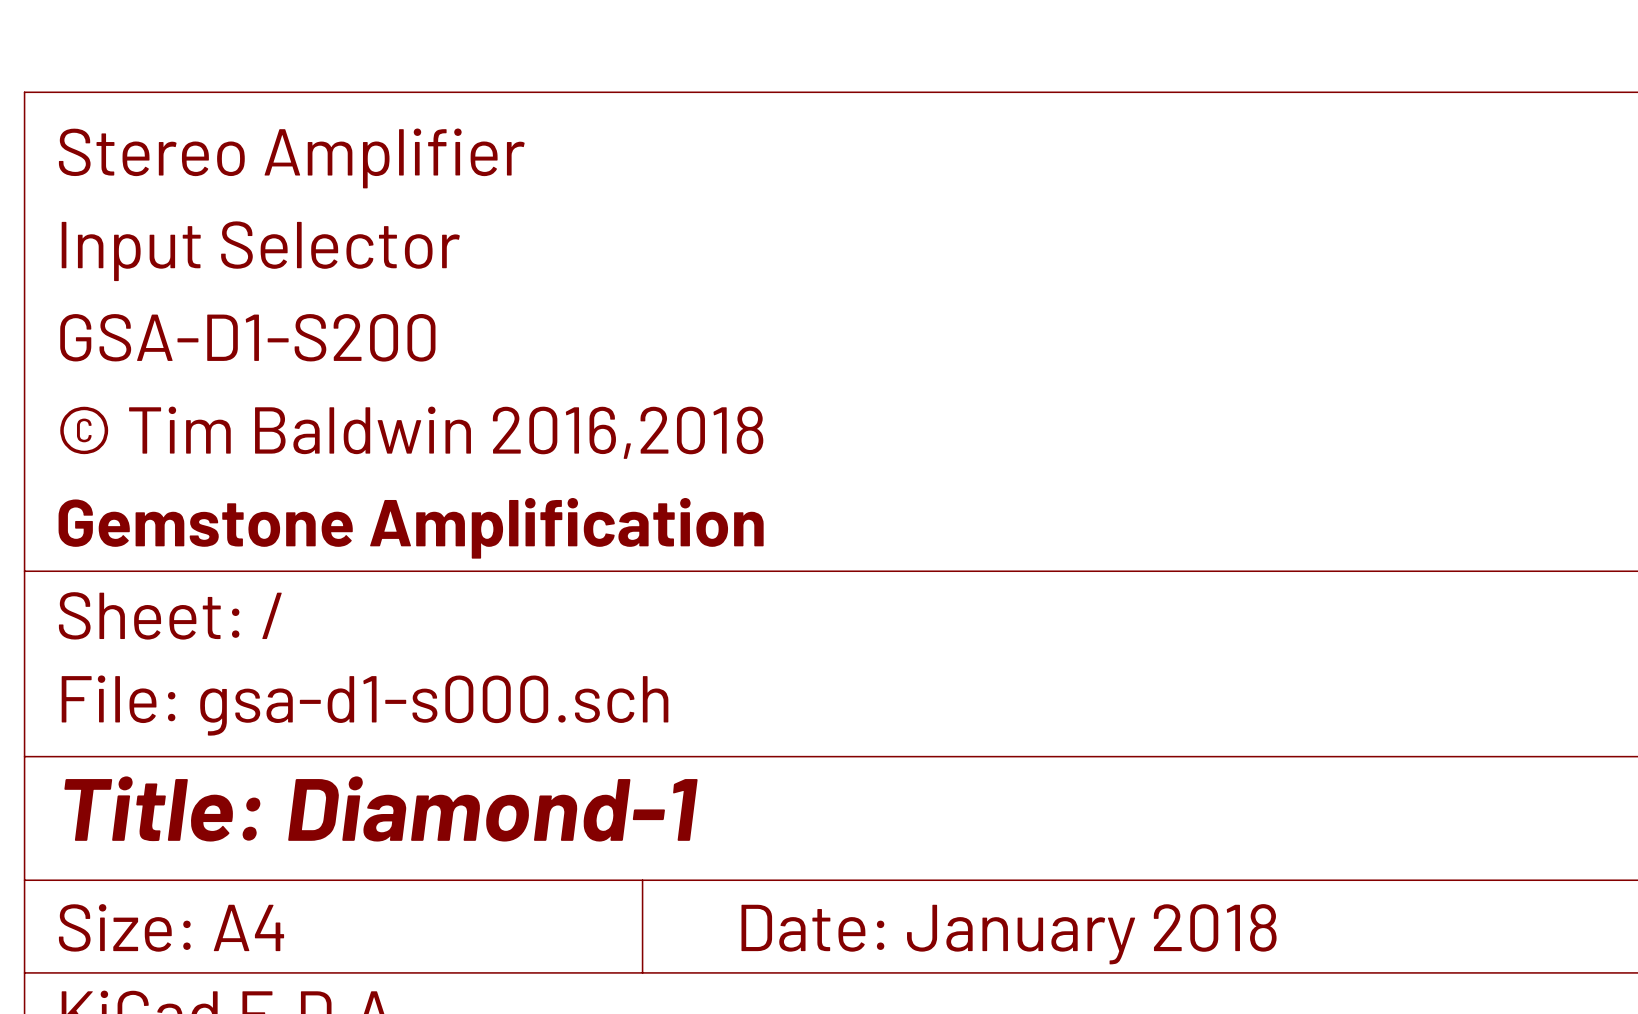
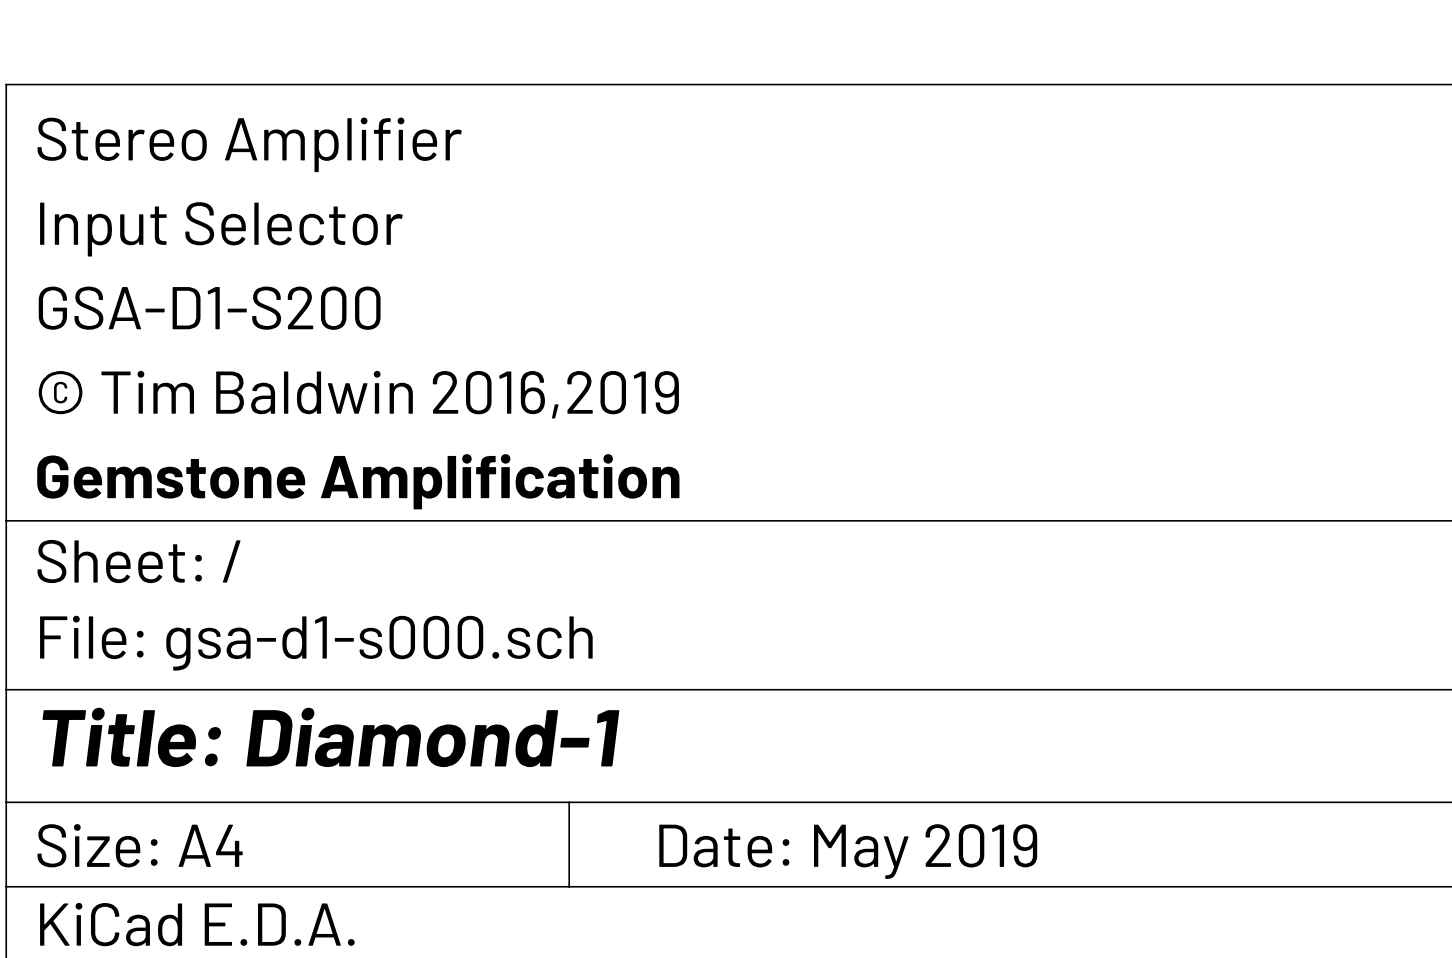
title block: © Tim Baldwin 2016,2018 (411, 432) -> © Tim Baldwin 2016,2019 (358, 394)
title block: Date: January 2018 (1009, 934) -> Date: May 2019 (848, 851)

